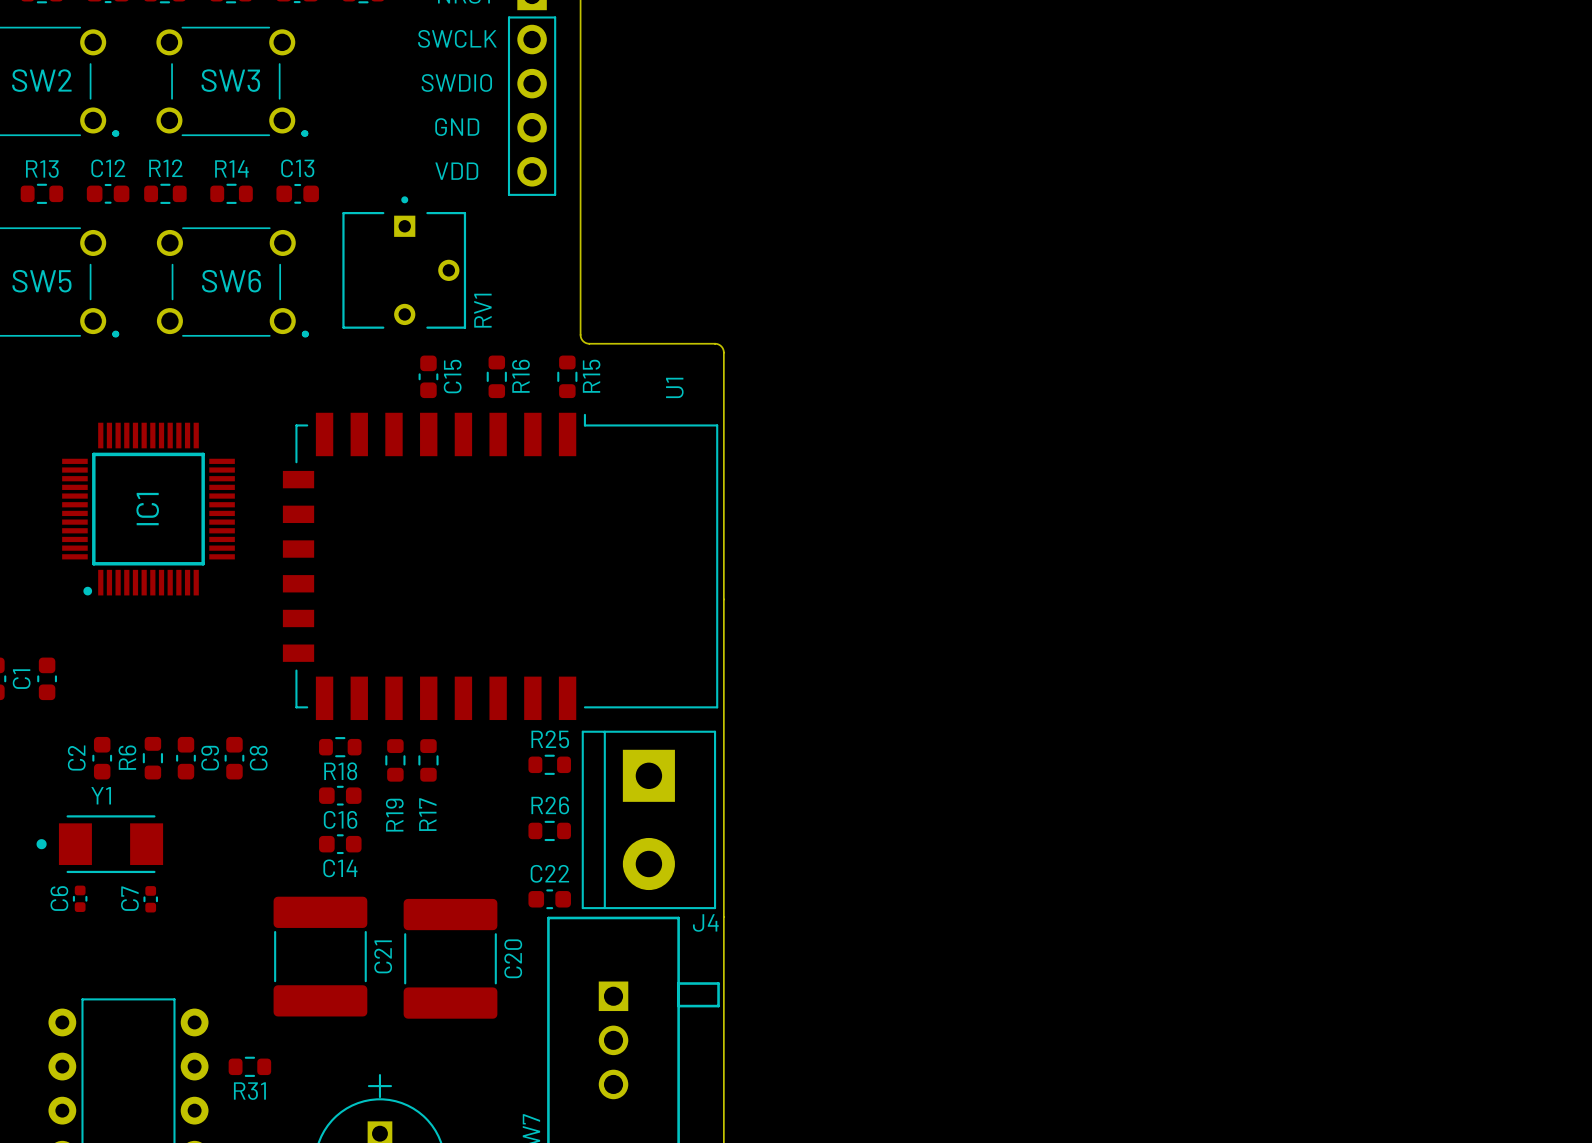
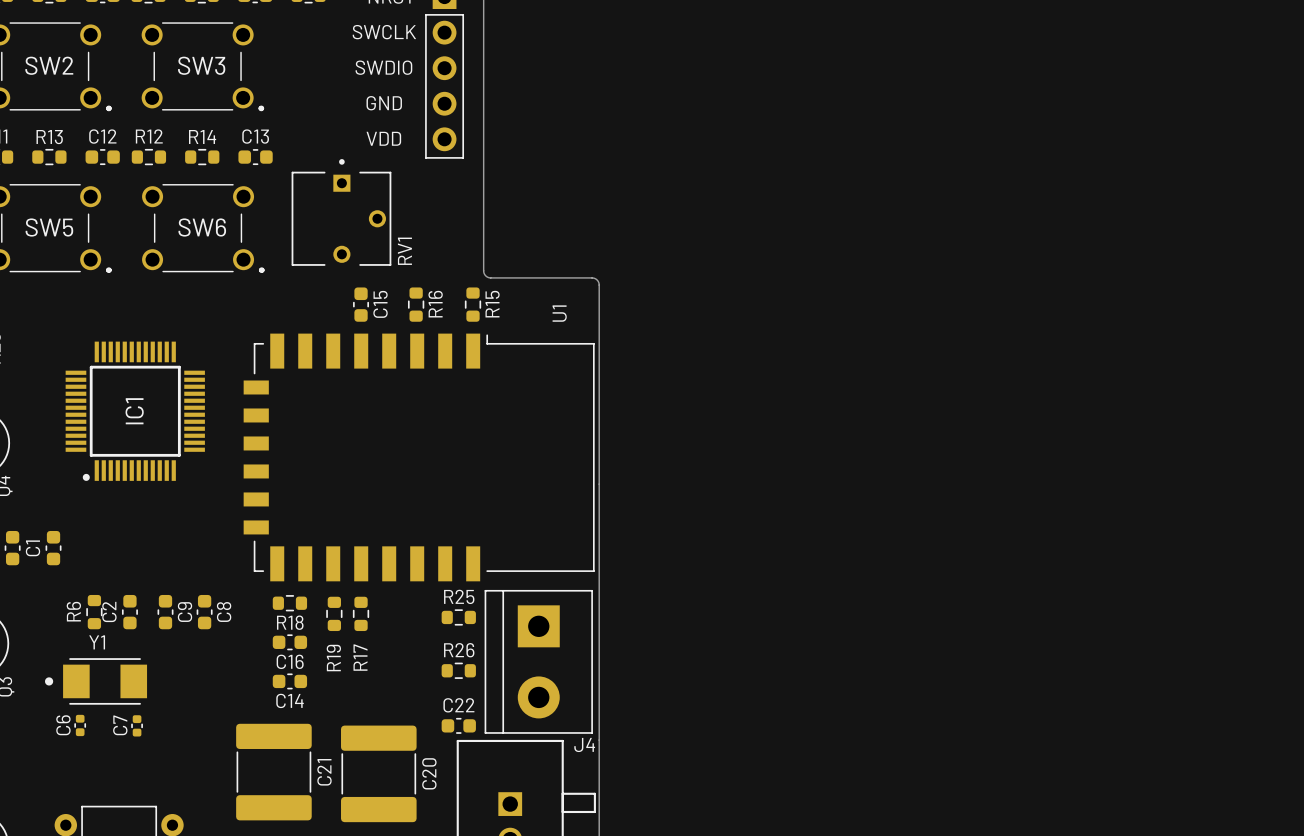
C2 position: (102, 758) -> (129, 612)
R6 position: (152, 758) -> (94, 612)

